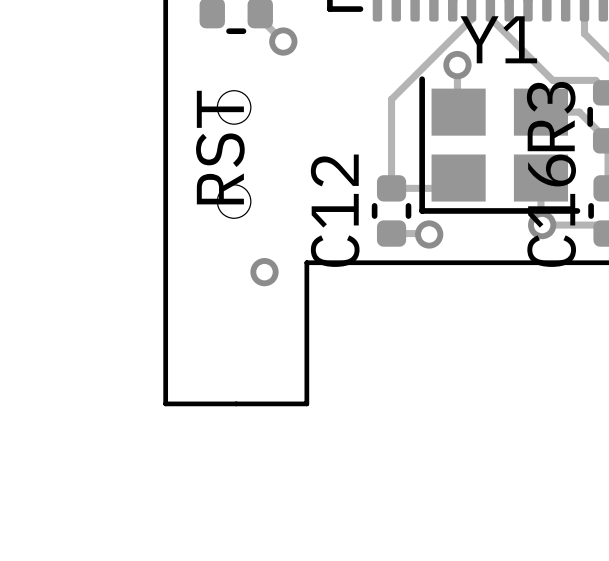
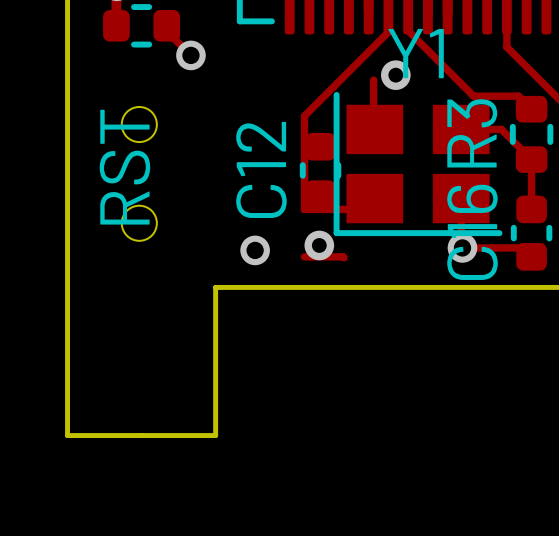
via position: (457, 65) -> (395, 75)
C12 position: (391, 210) -> (320, 170)
via: none -> (255, 250)
via position: (429, 234) -> (319, 245)
via: (264, 272) -> none

